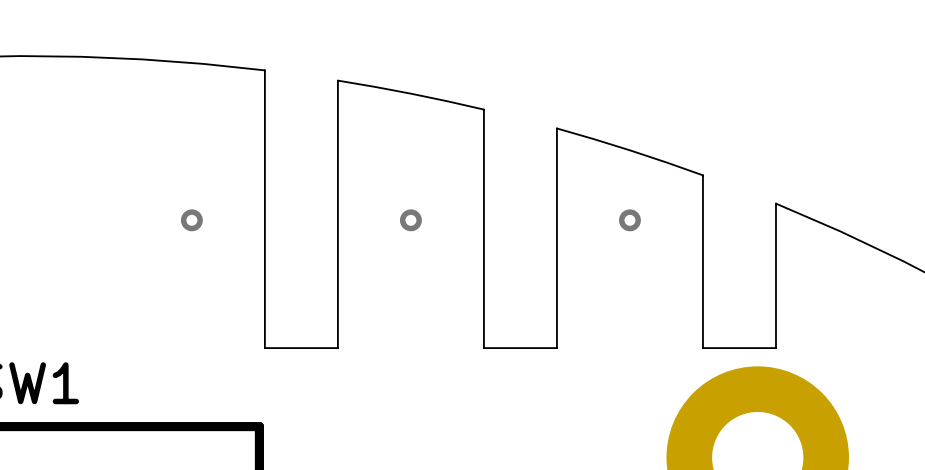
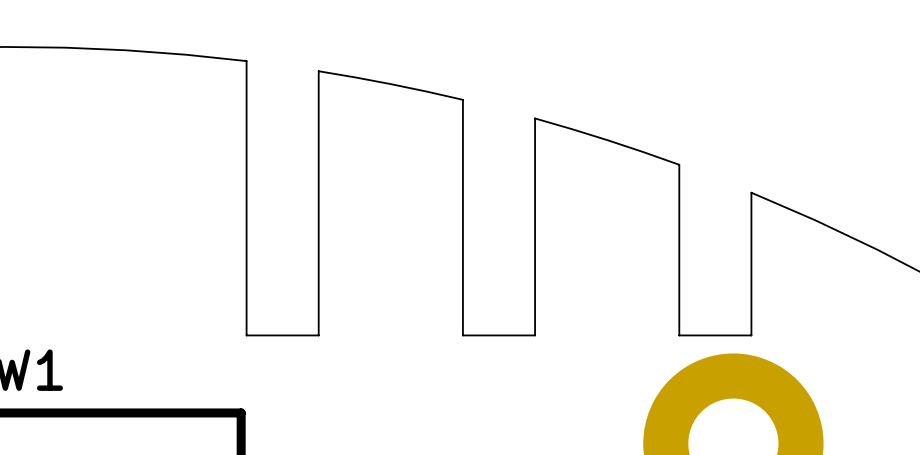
via: (191, 220) -> none
via: (410, 220) -> none
via: (629, 220) -> none

